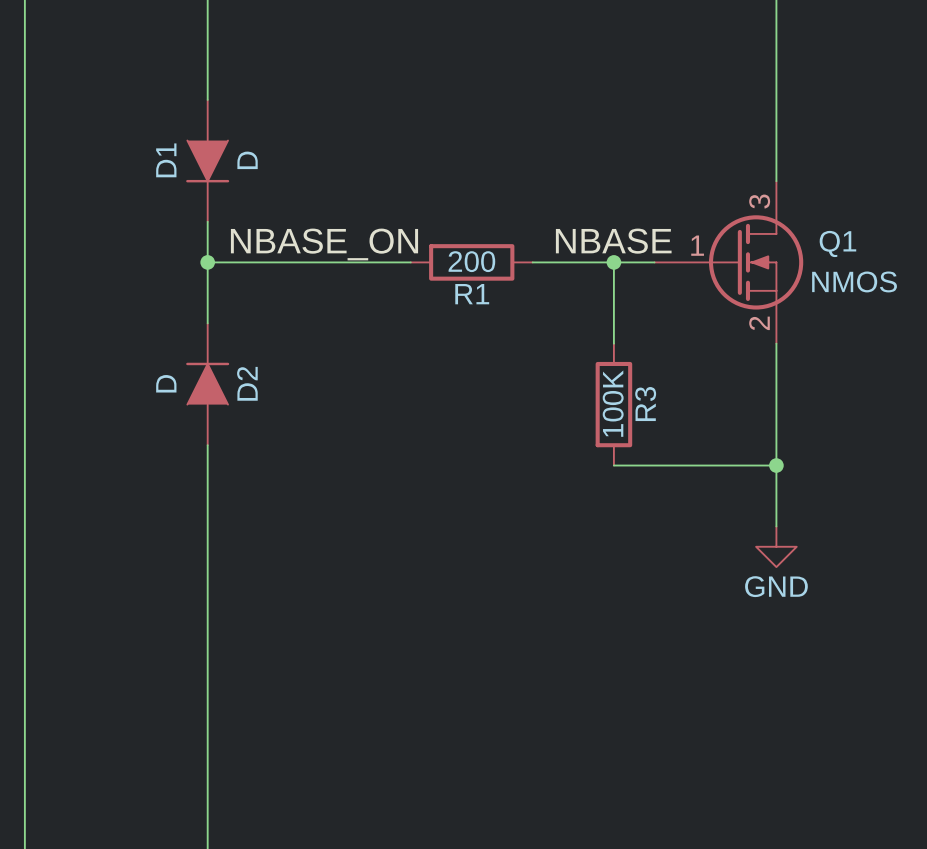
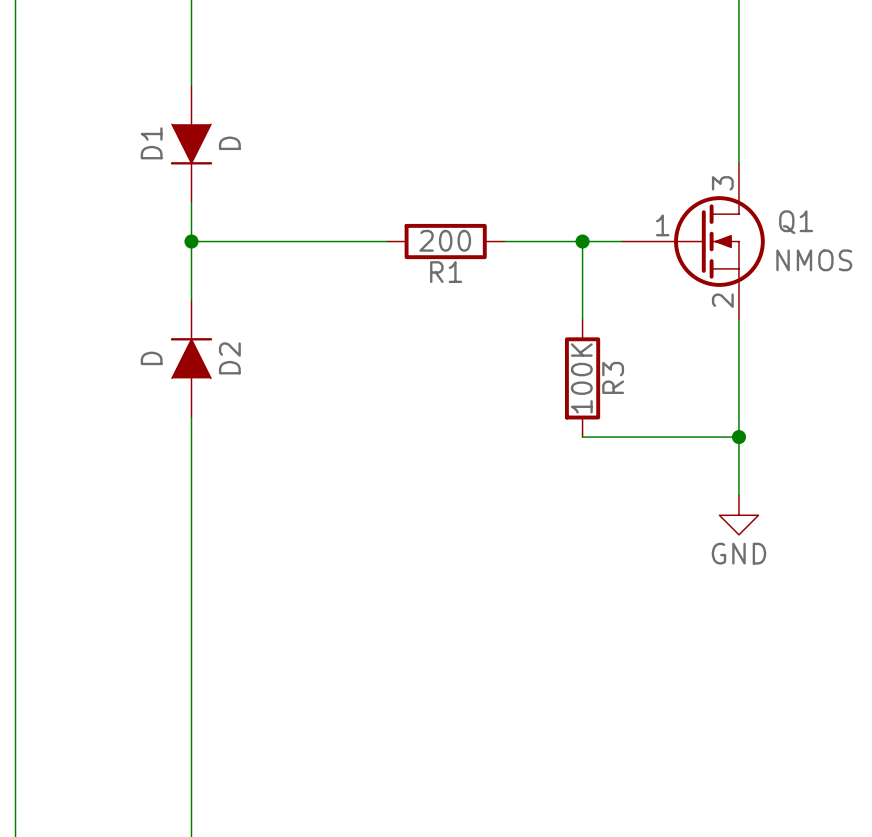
label: NBASE (613, 241) -> none
label: NBASE_ON (324, 244) -> none

